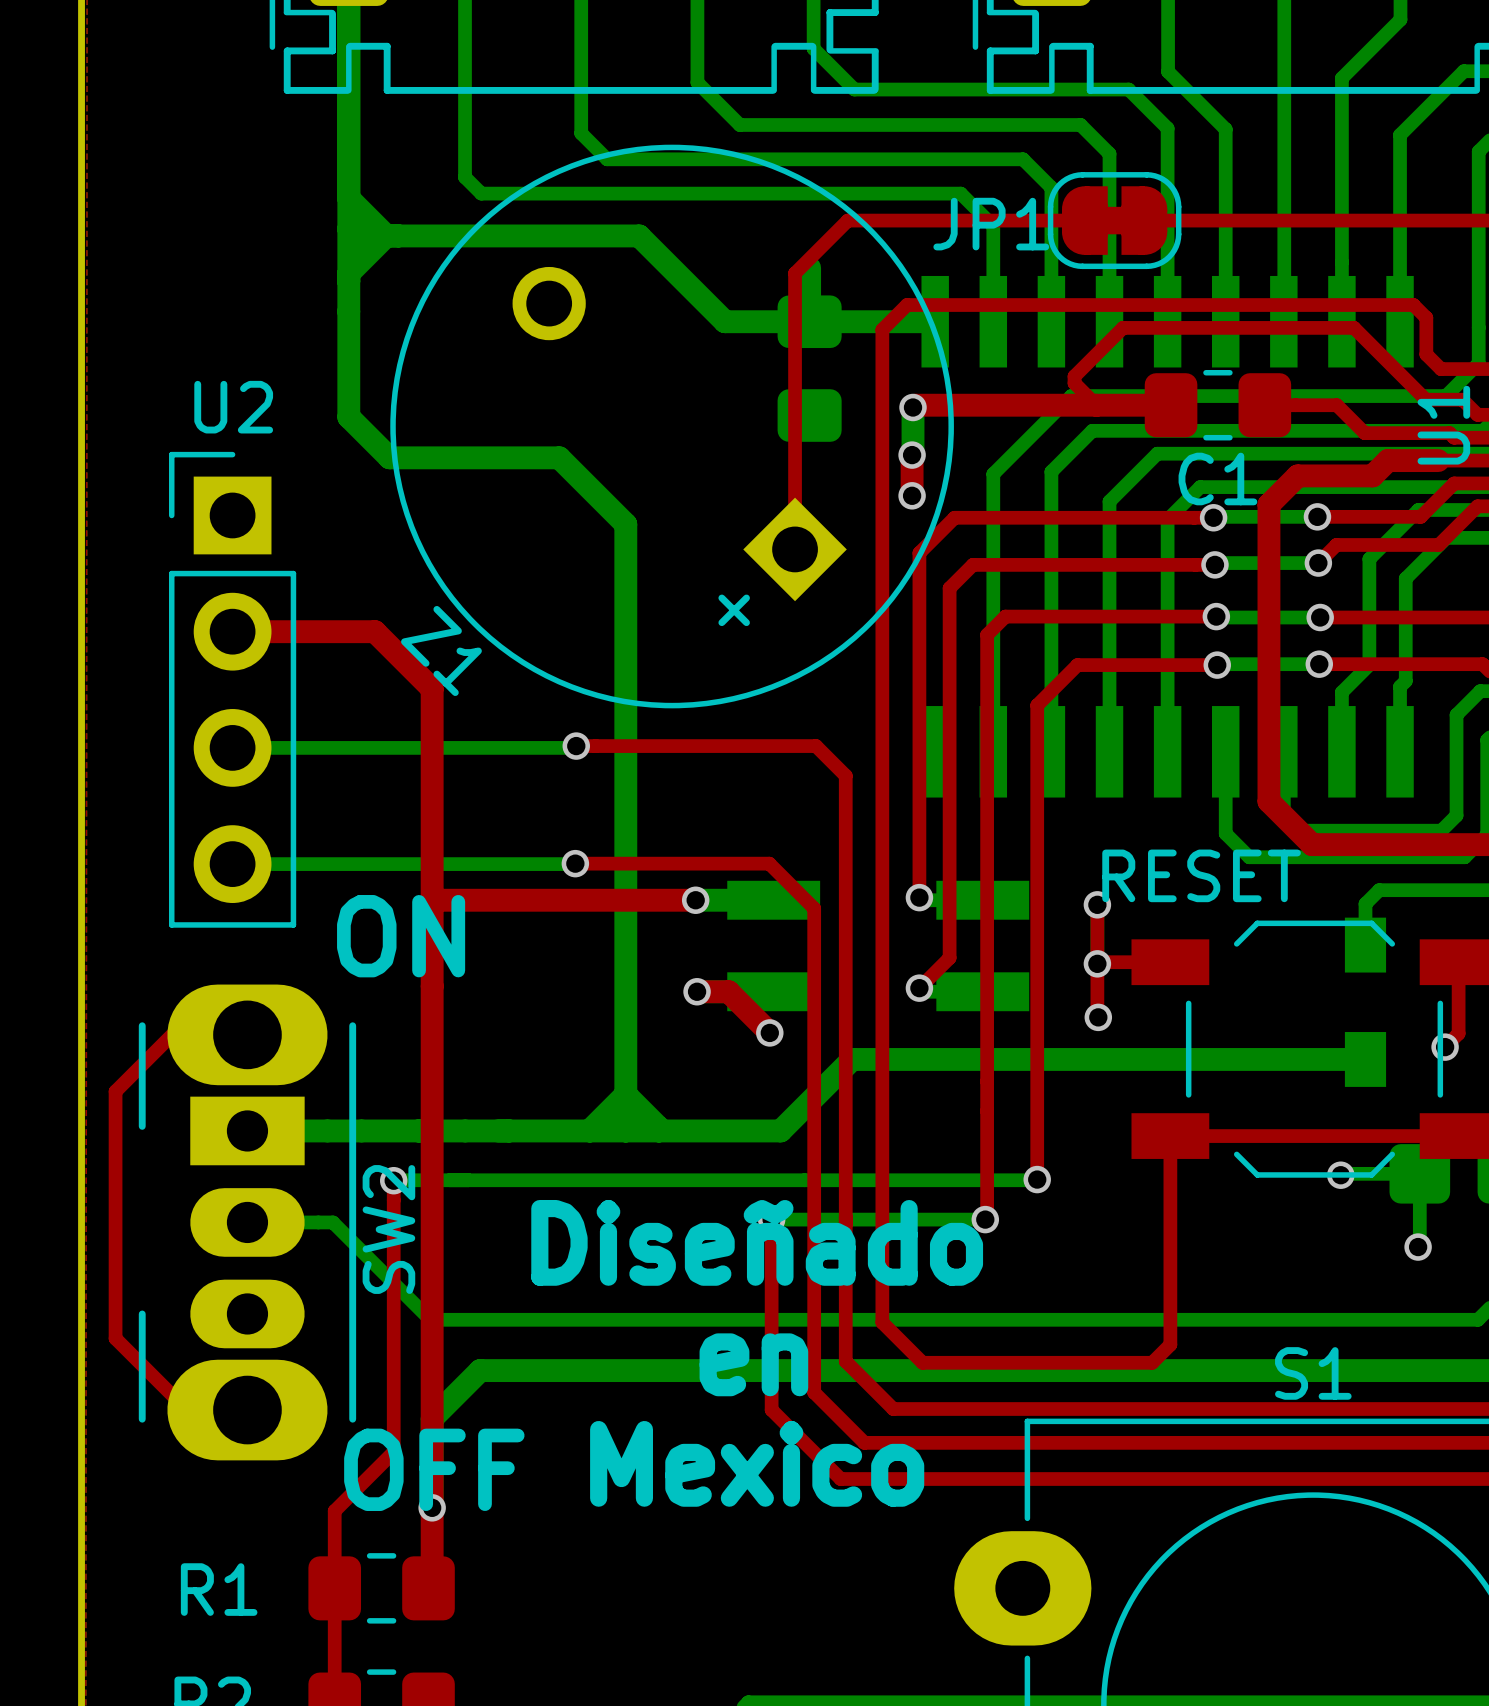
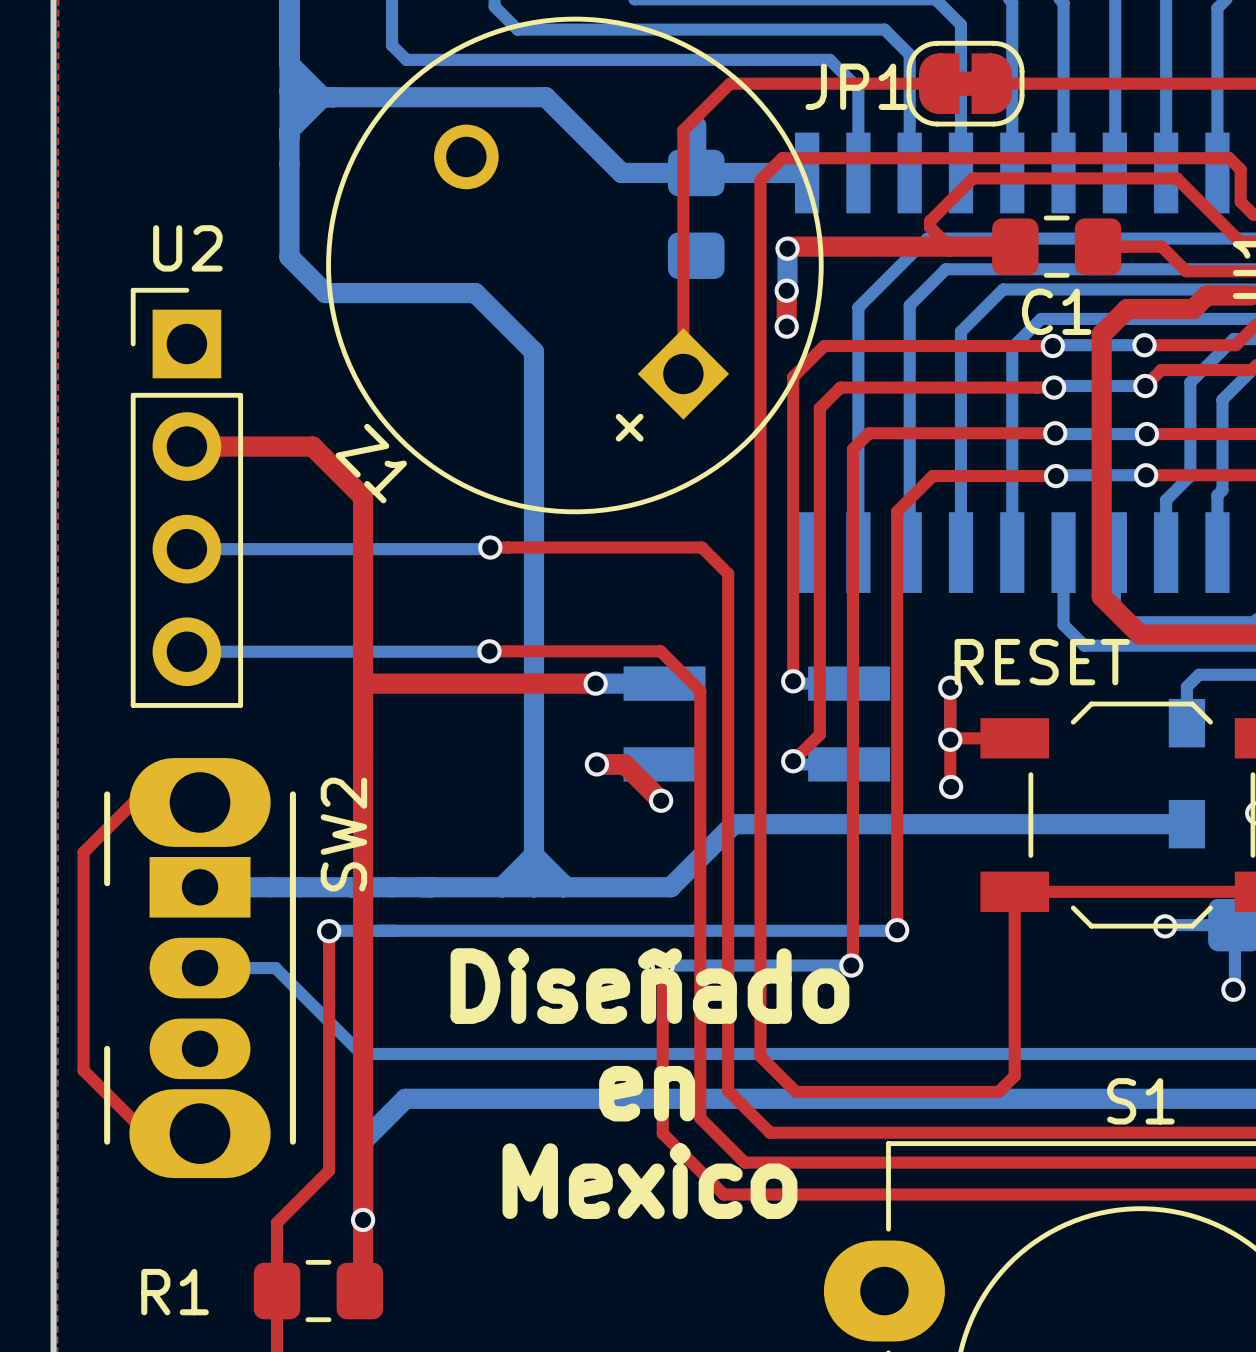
text: ON (401, 936) -> none
SW2 name position: SW2 (388, 1229) -> SW2 (343, 834)
text: OFF (434, 1469) -> none

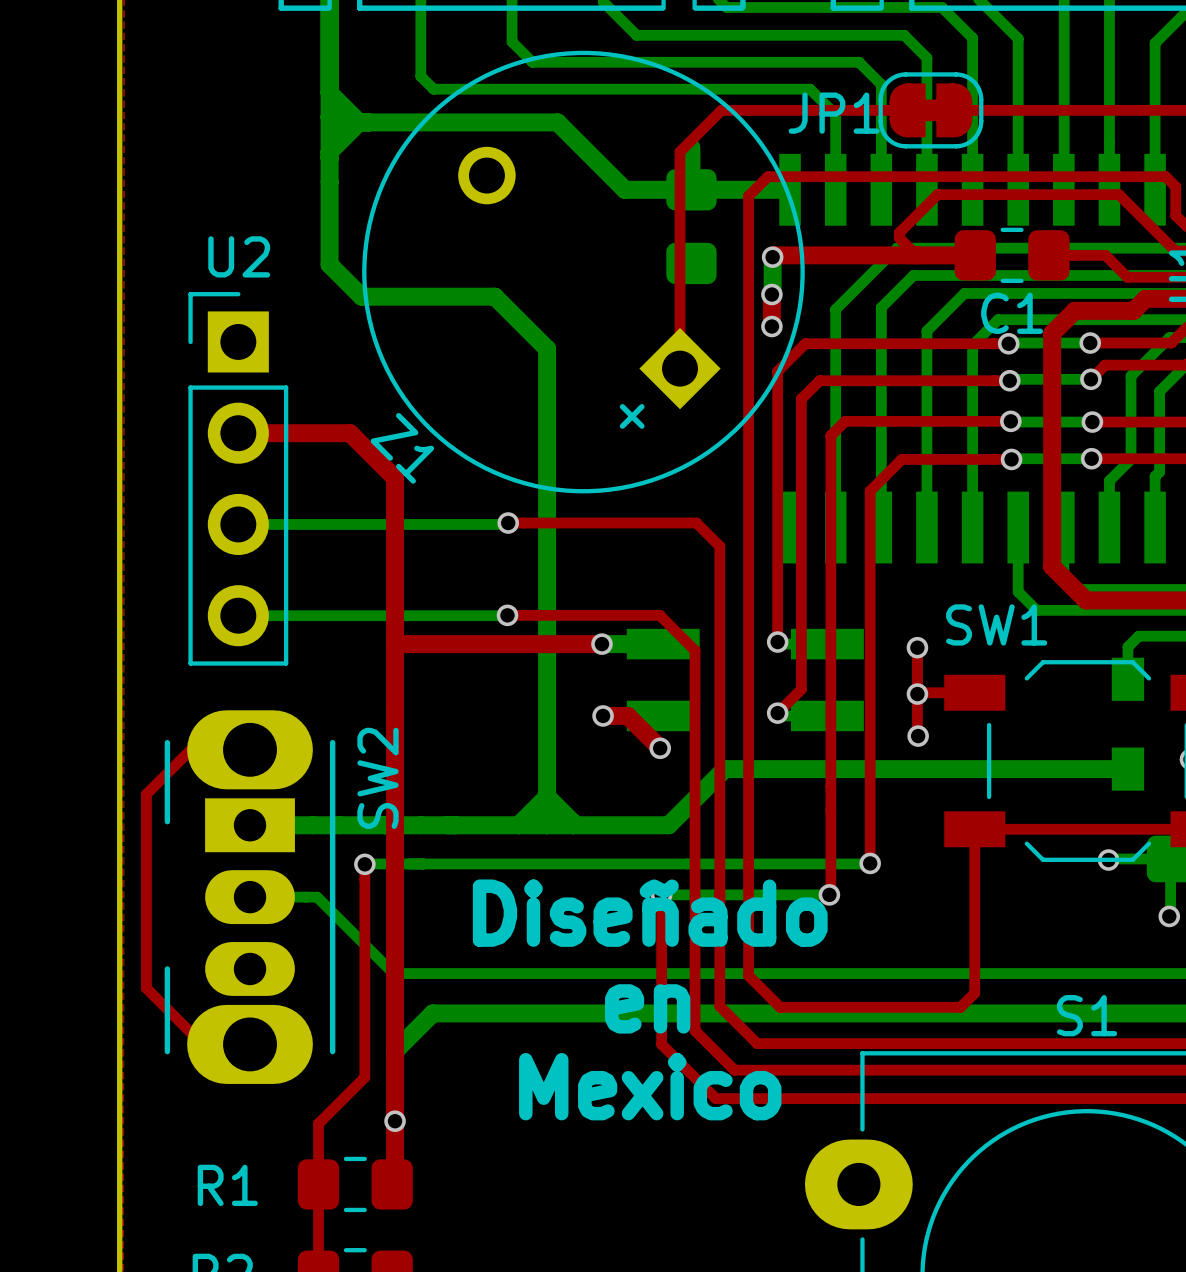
RESET name: RESET (1042, 662) -> SW1 (996, 624)

